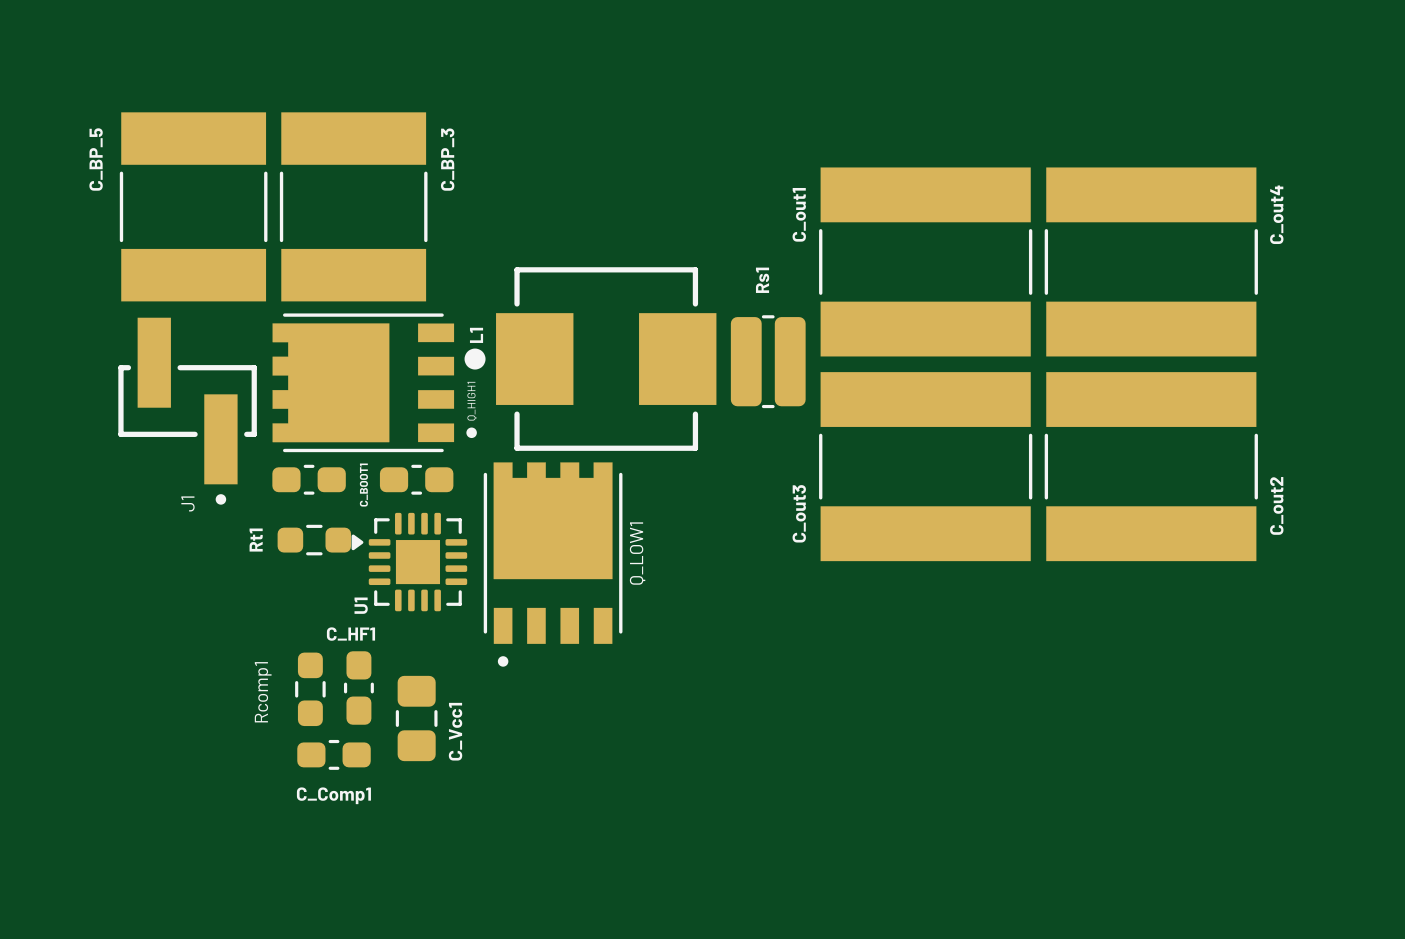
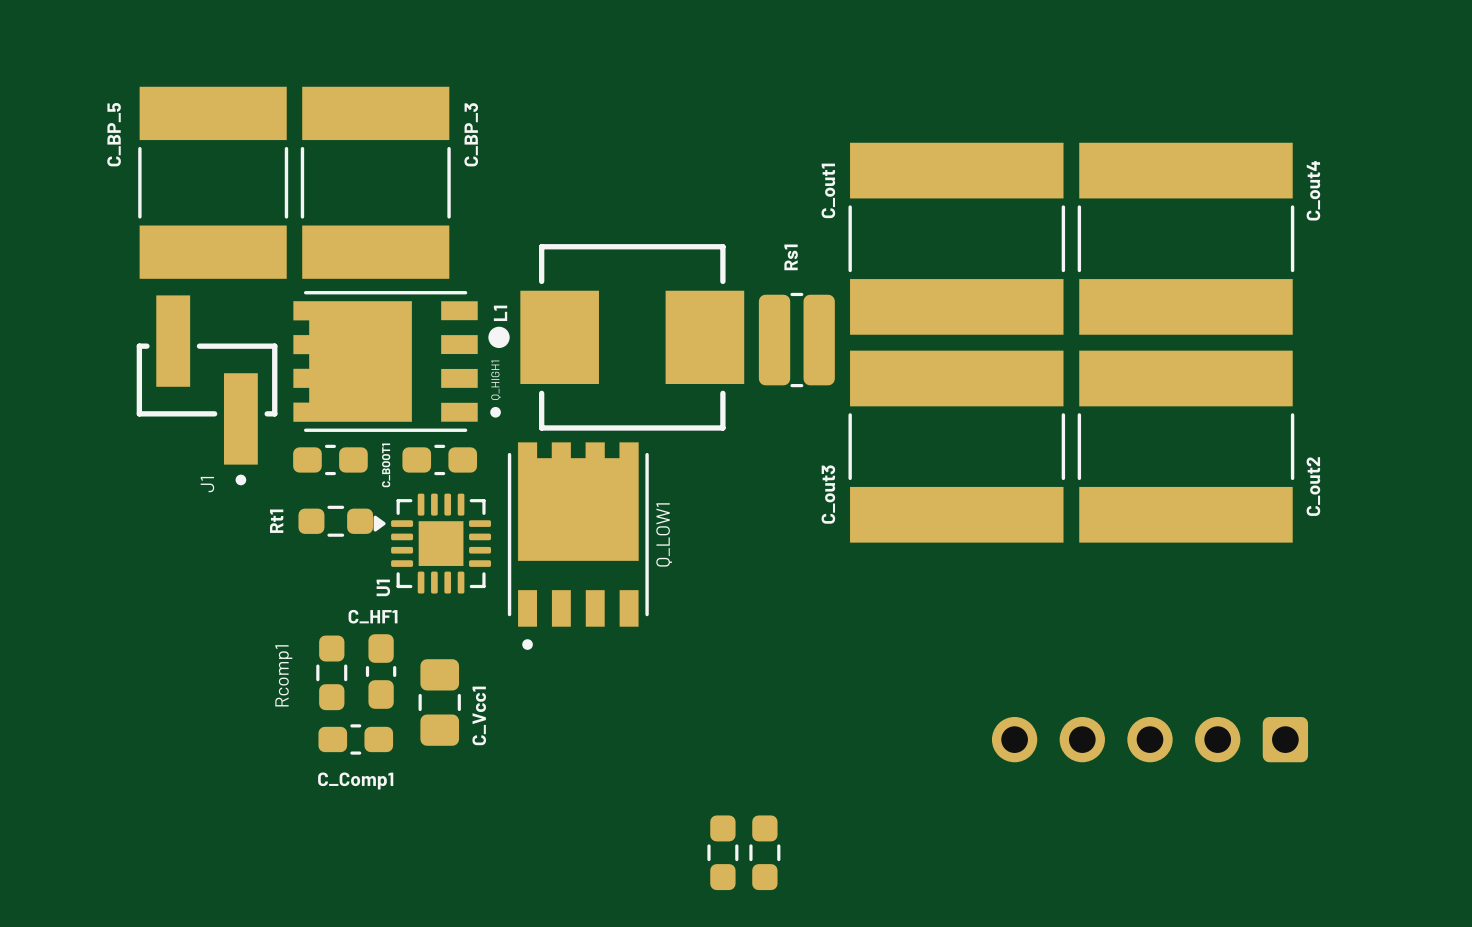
part: none -> (1149, 739)
part: none -> (722, 852)
part: none -> (764, 852)

